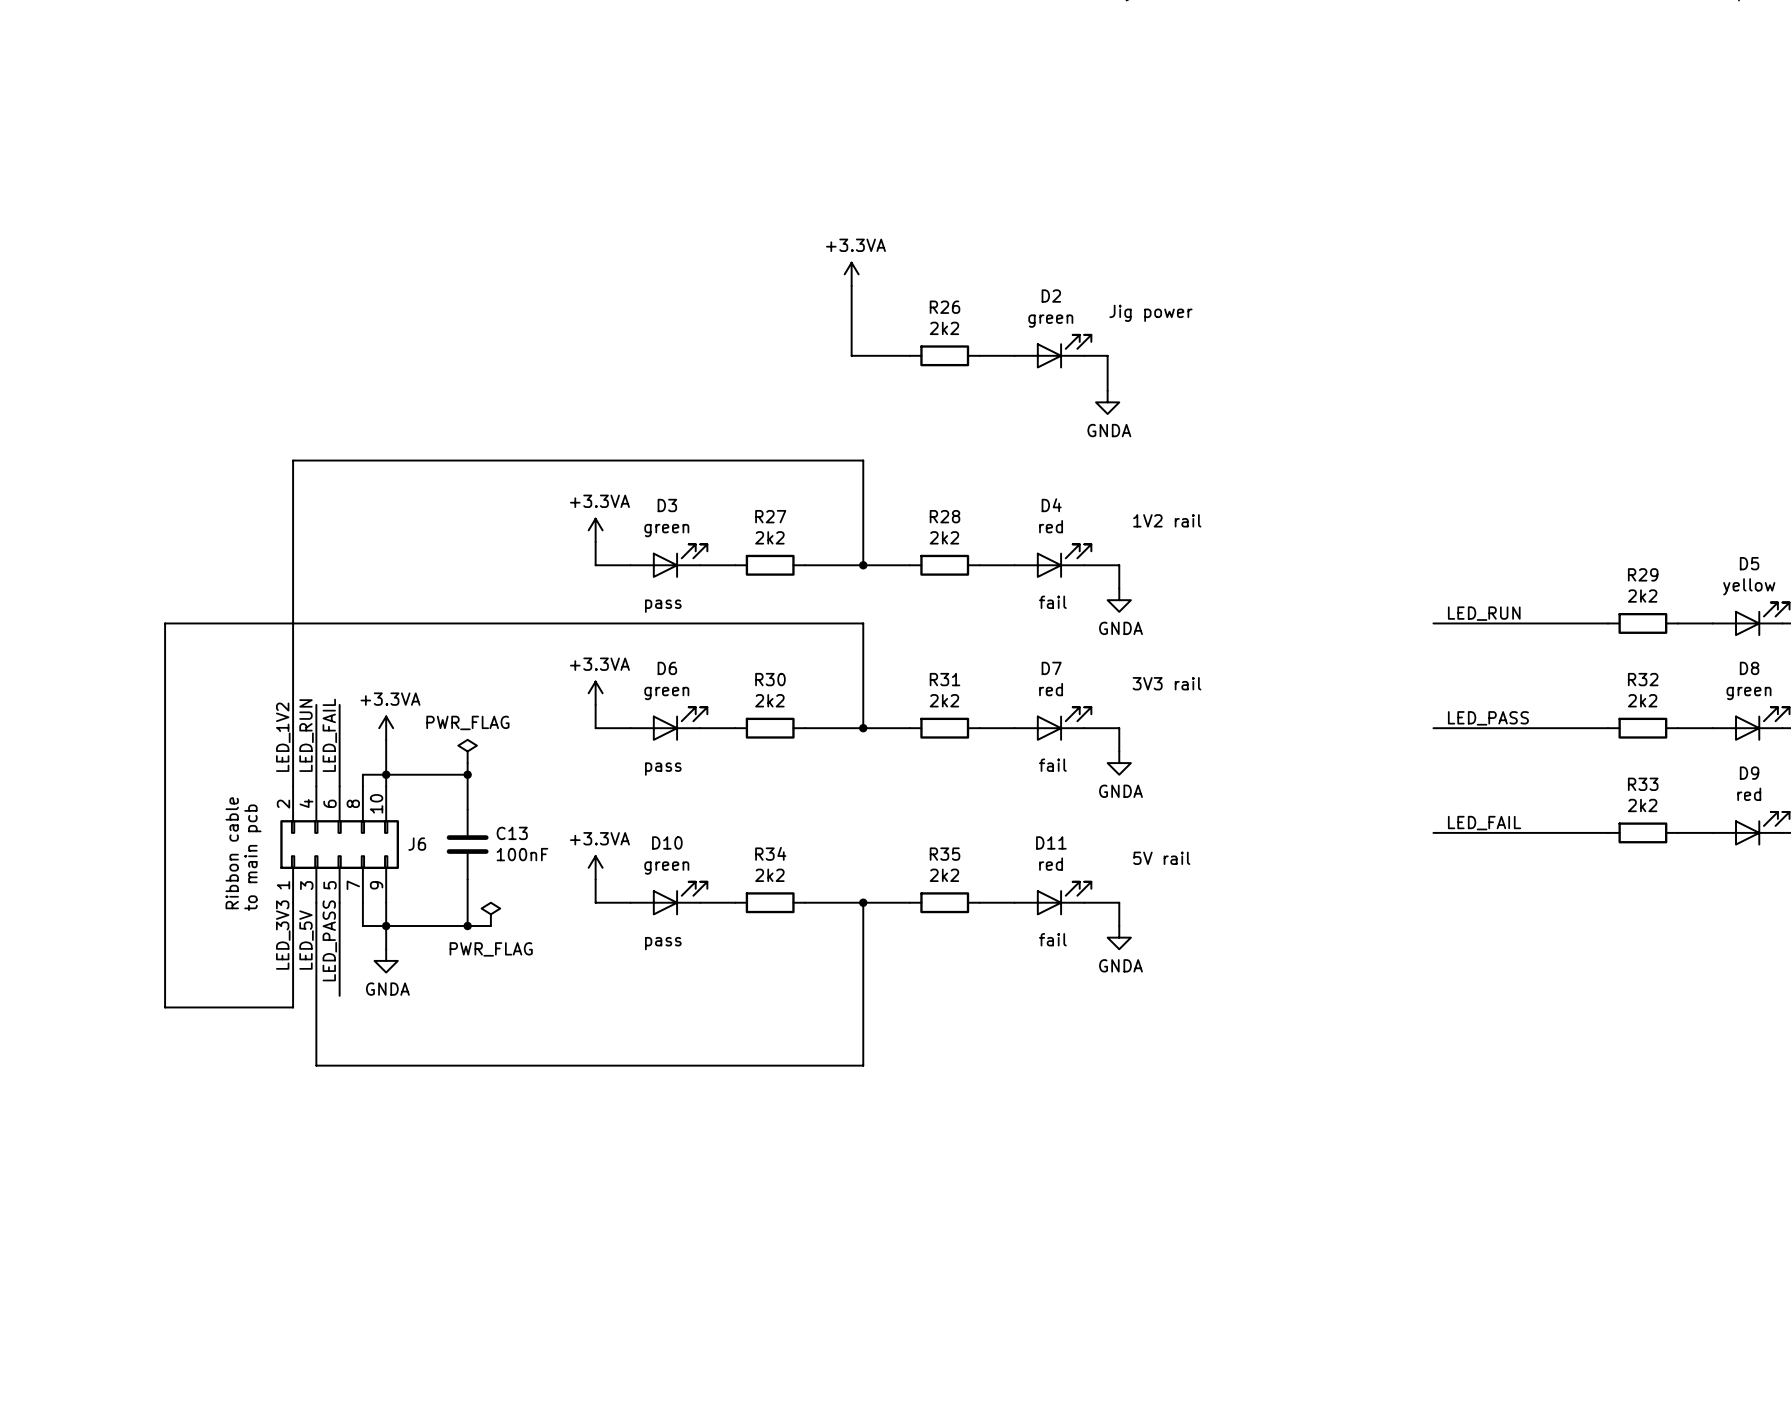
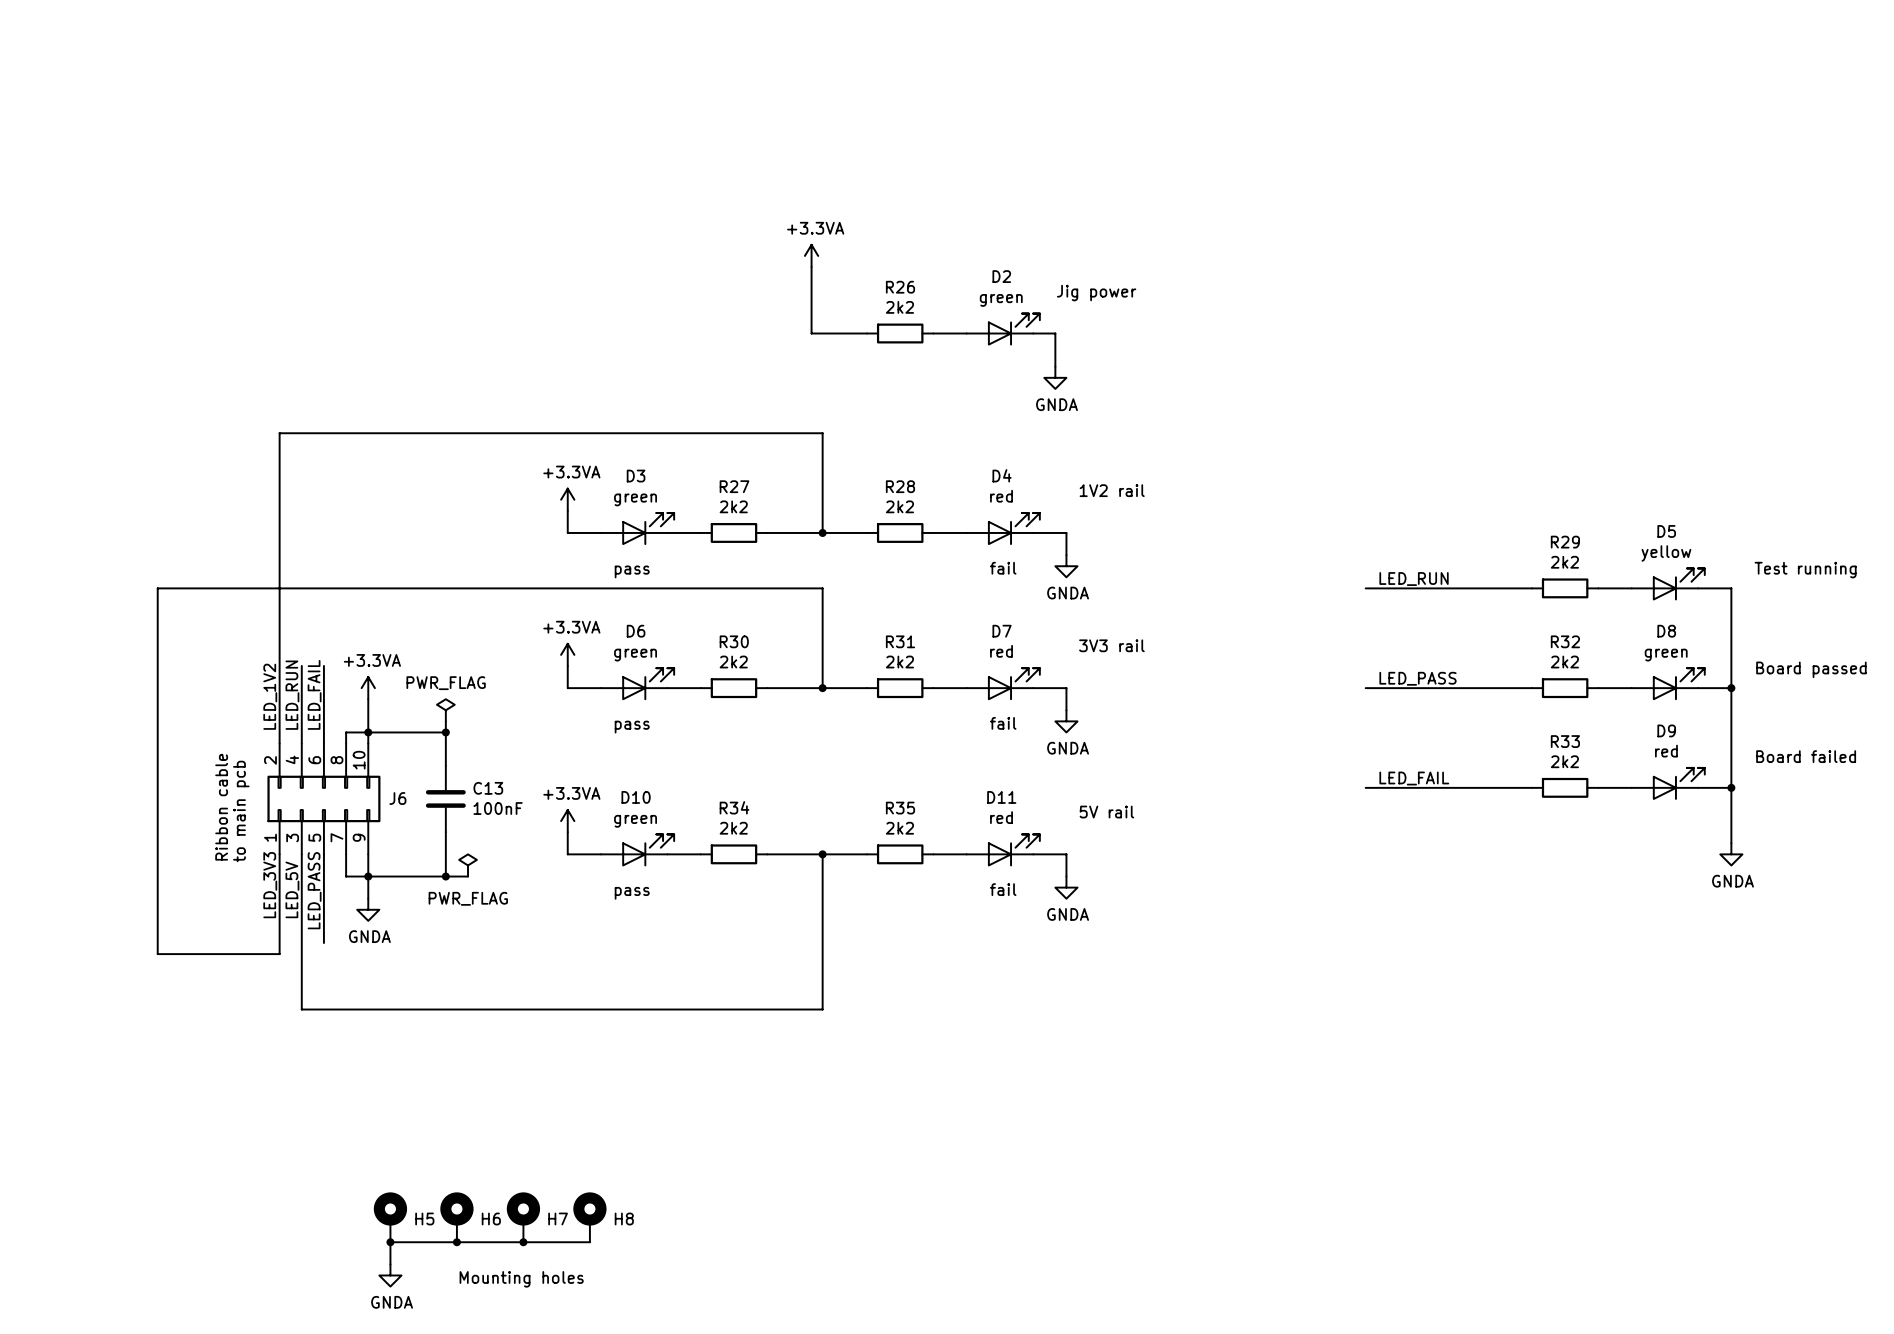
H5: none -> (390, 1217)
H6: none -> (456, 1217)
H7: none -> (523, 1217)
H8: none -> (589, 1217)
junction: none -> (390, 1242)
junction: none -> (456, 1242)
junction: none -> (523, 1242)
wire: none -> (589, 1242) (390, 1242) (390, 1264)
power symbol: none -> GNDA (390, 1275)
text: none -> Mounting holes (521, 1279)

